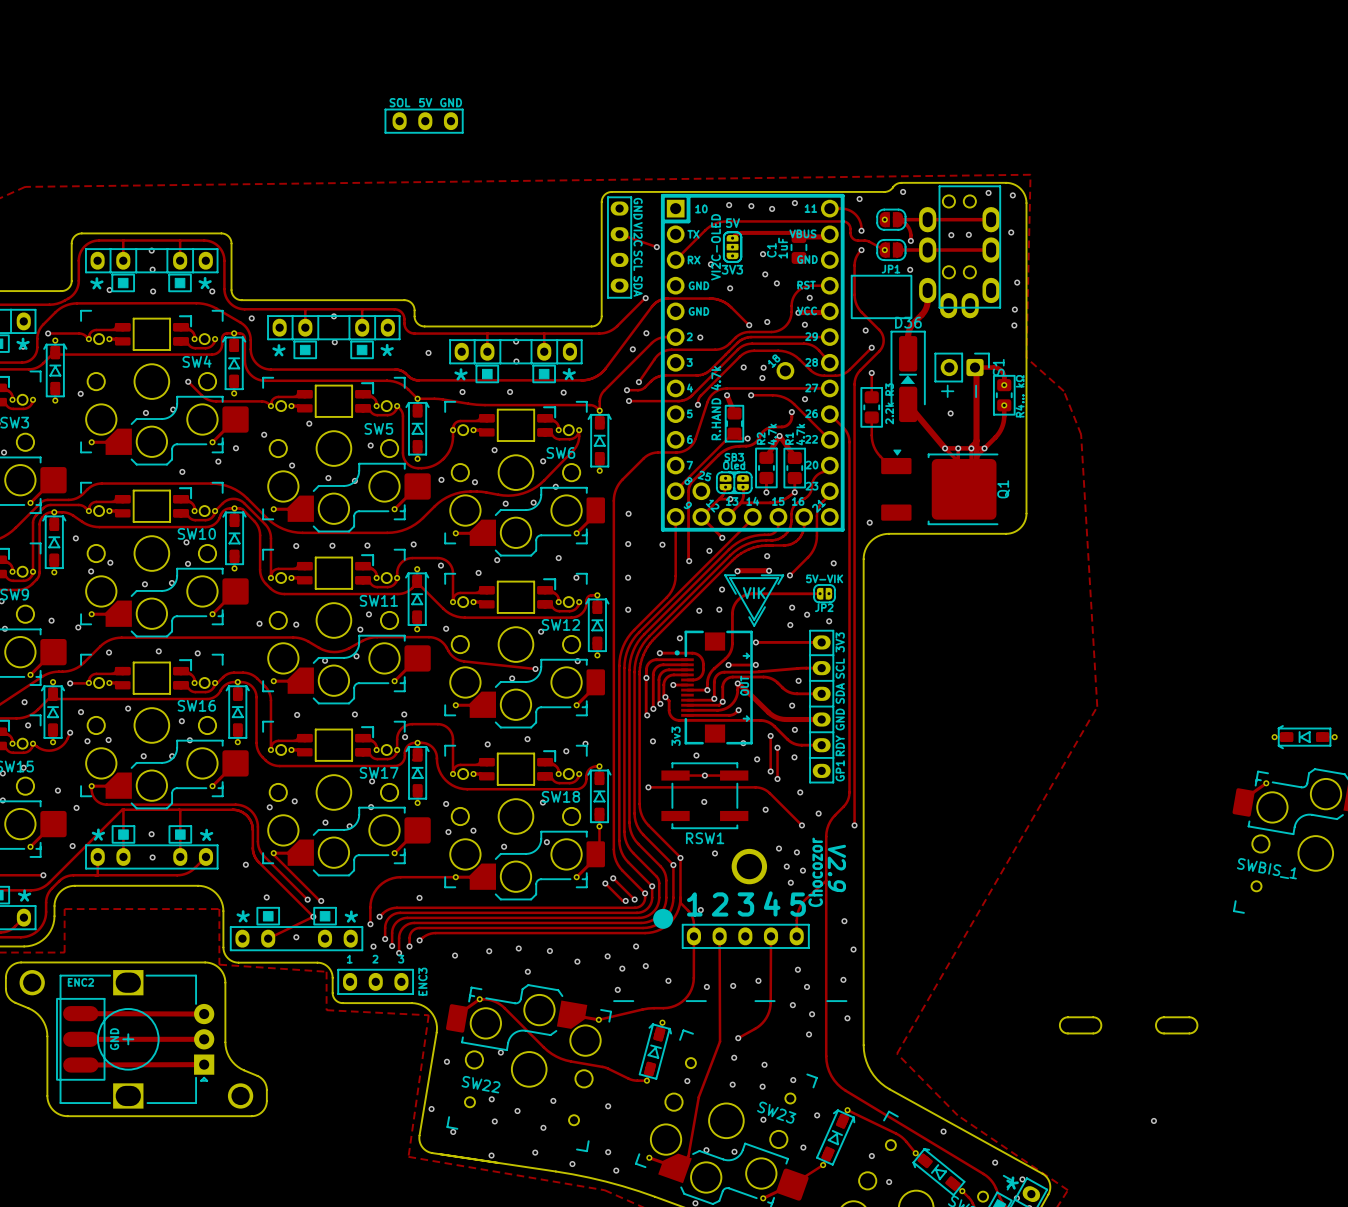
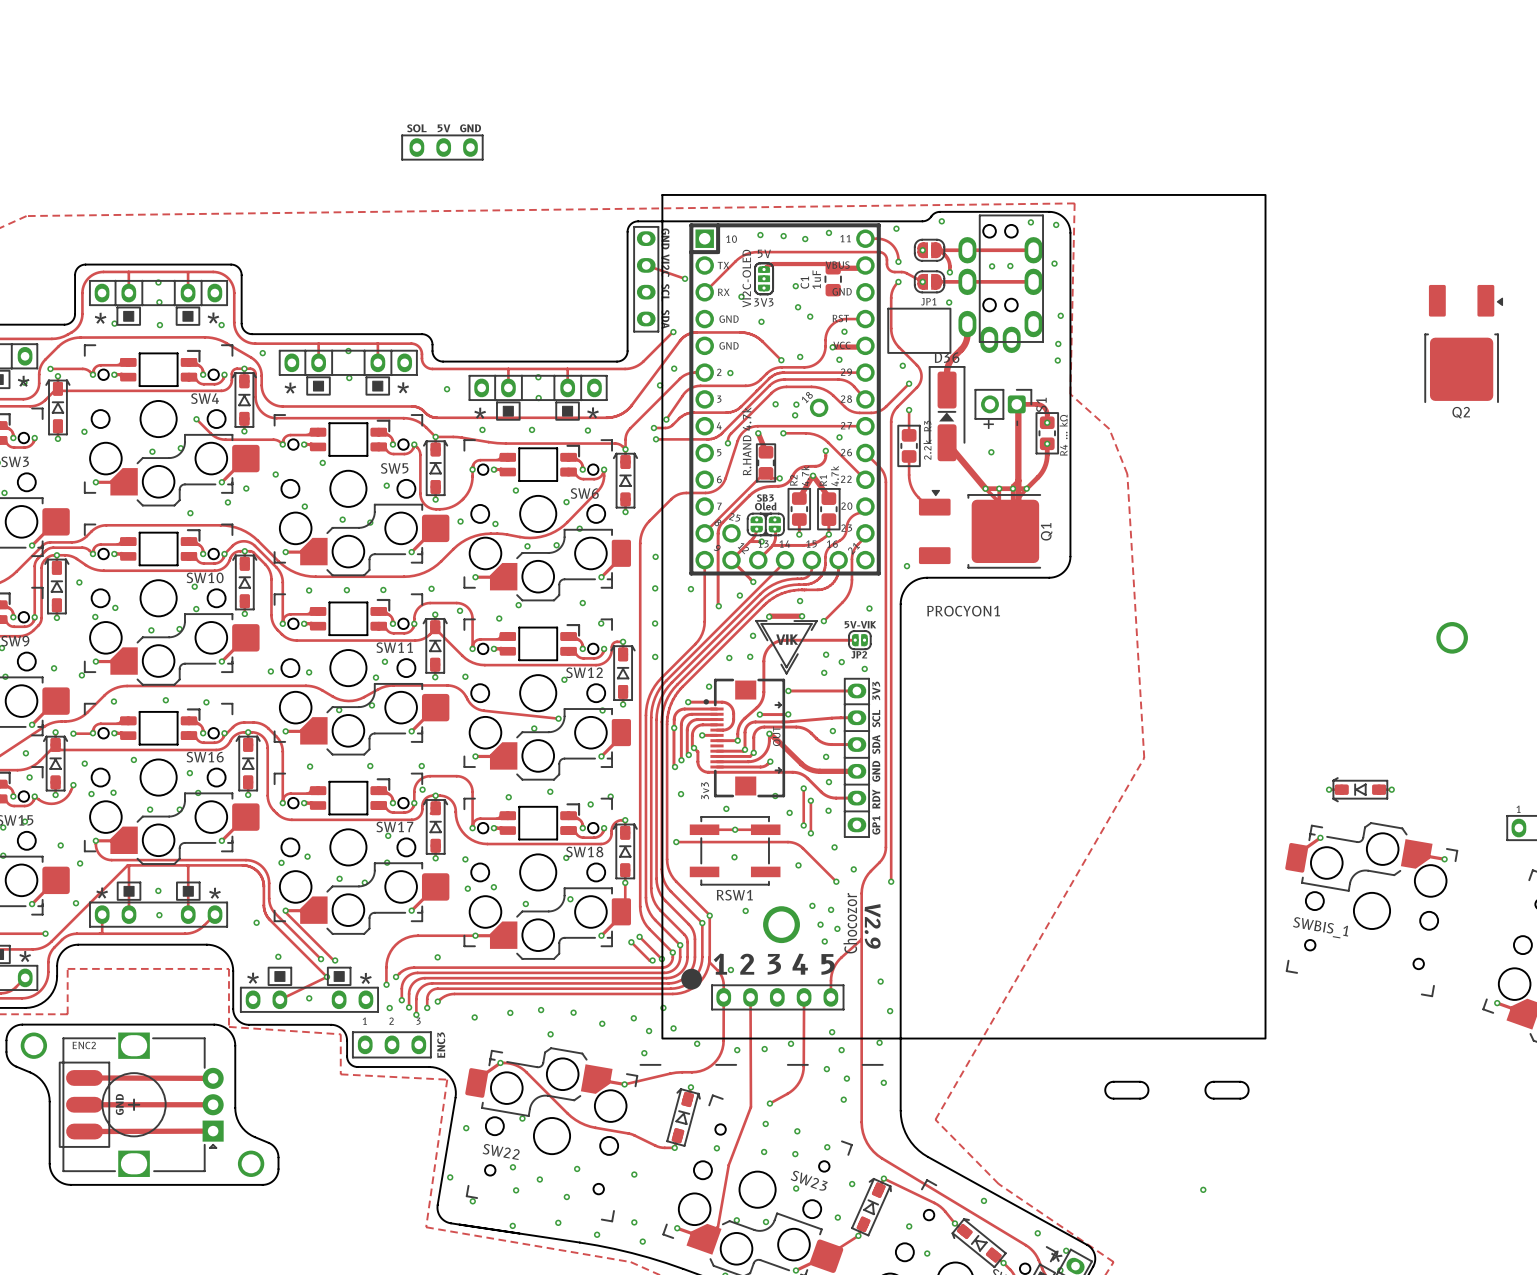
PROCYON1: none -> (963, 616)

